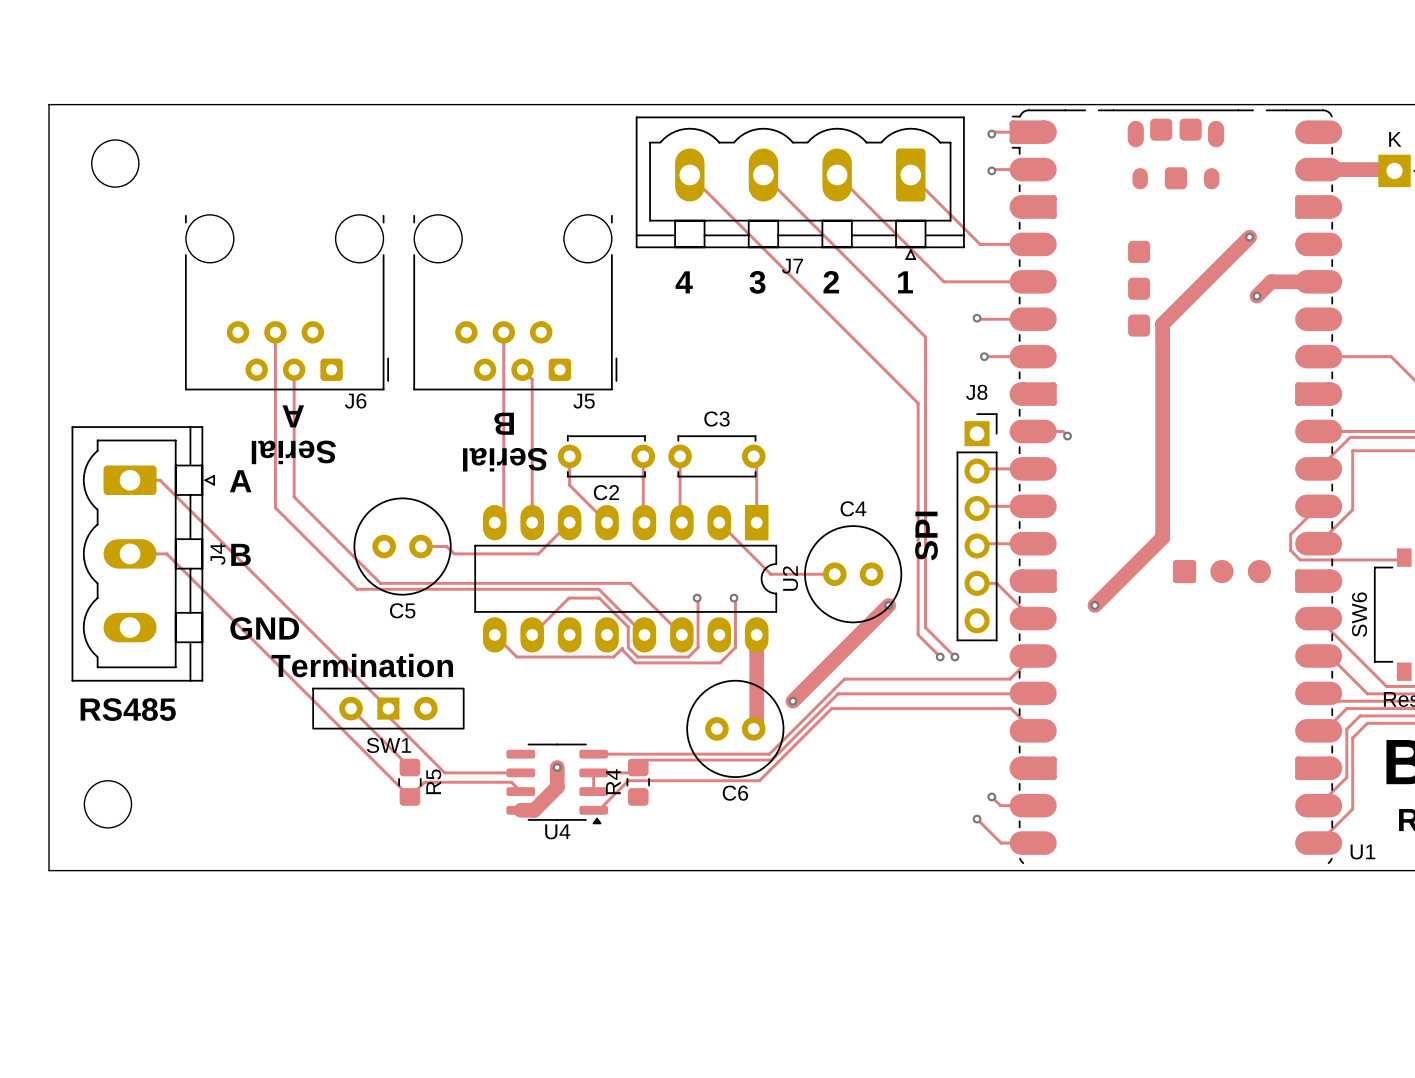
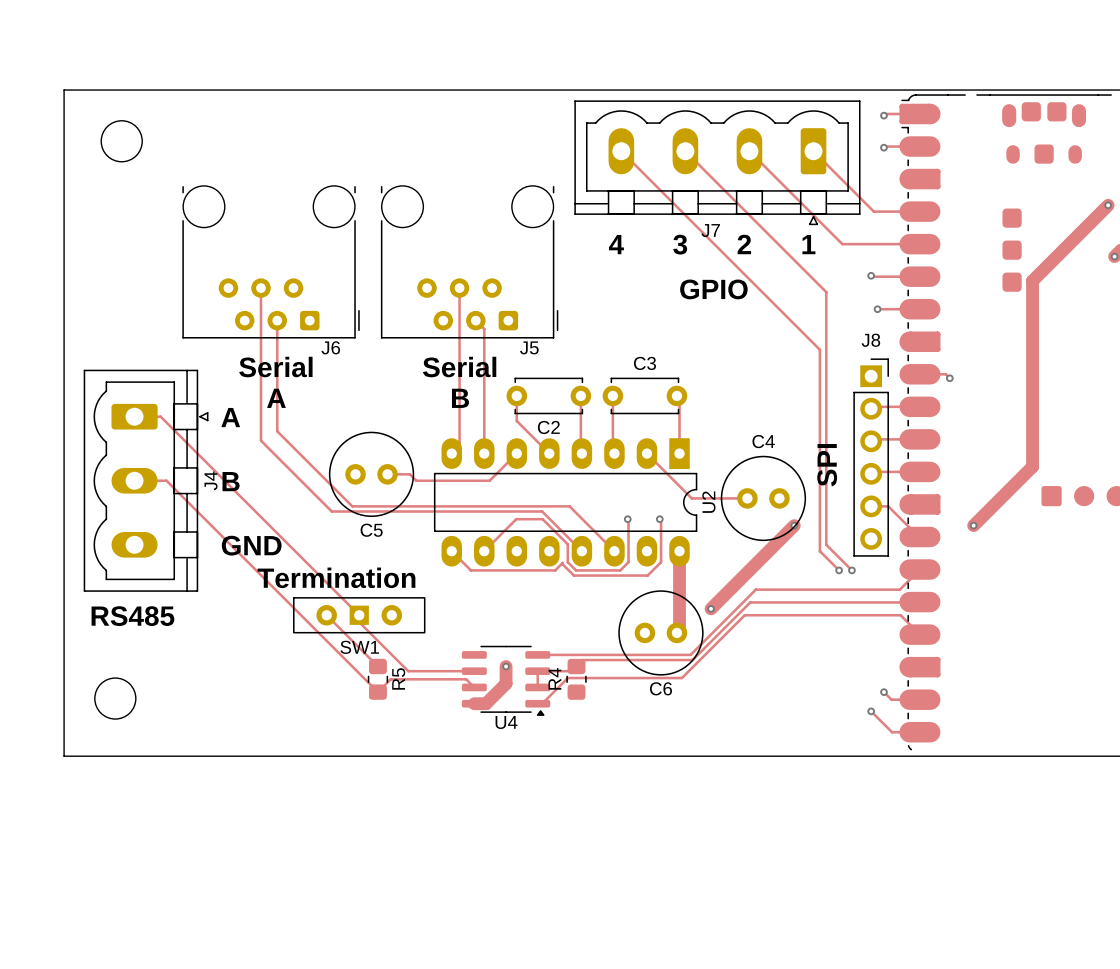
text: none -> GPIO (713, 289)
text rotation: 0° (293, 416) -> 180° (276, 398)
text rotation: 0° (504, 423) -> 180° (460, 398)
text rotation: 0° (293, 452) -> 180° (275, 367)
text rotation: 0° (505, 459) -> 180° (459, 367)

